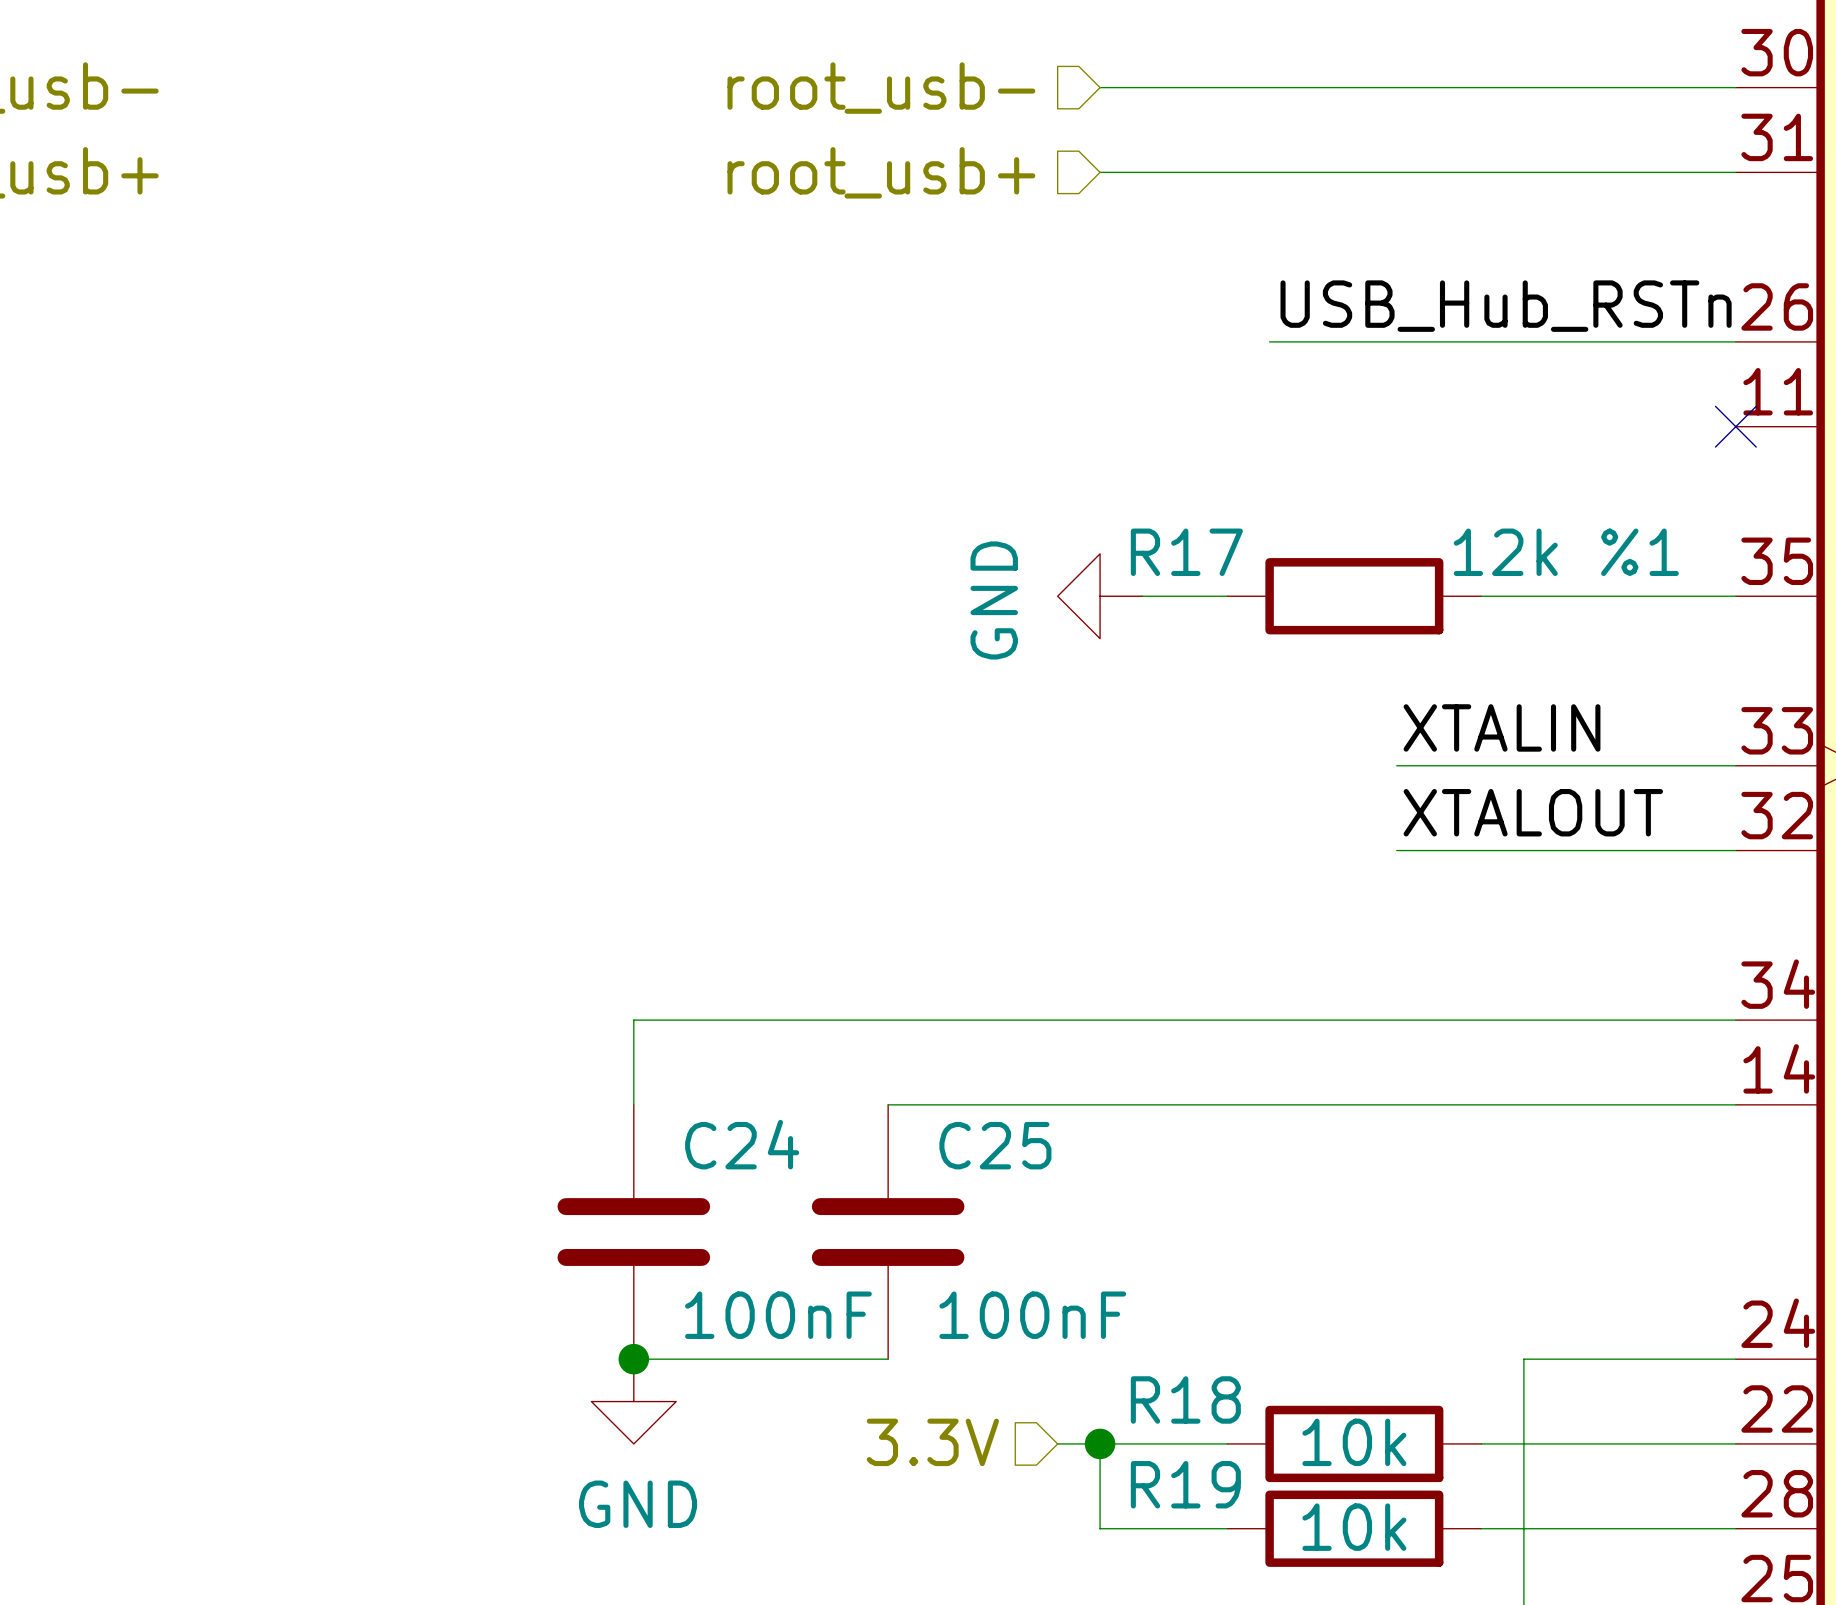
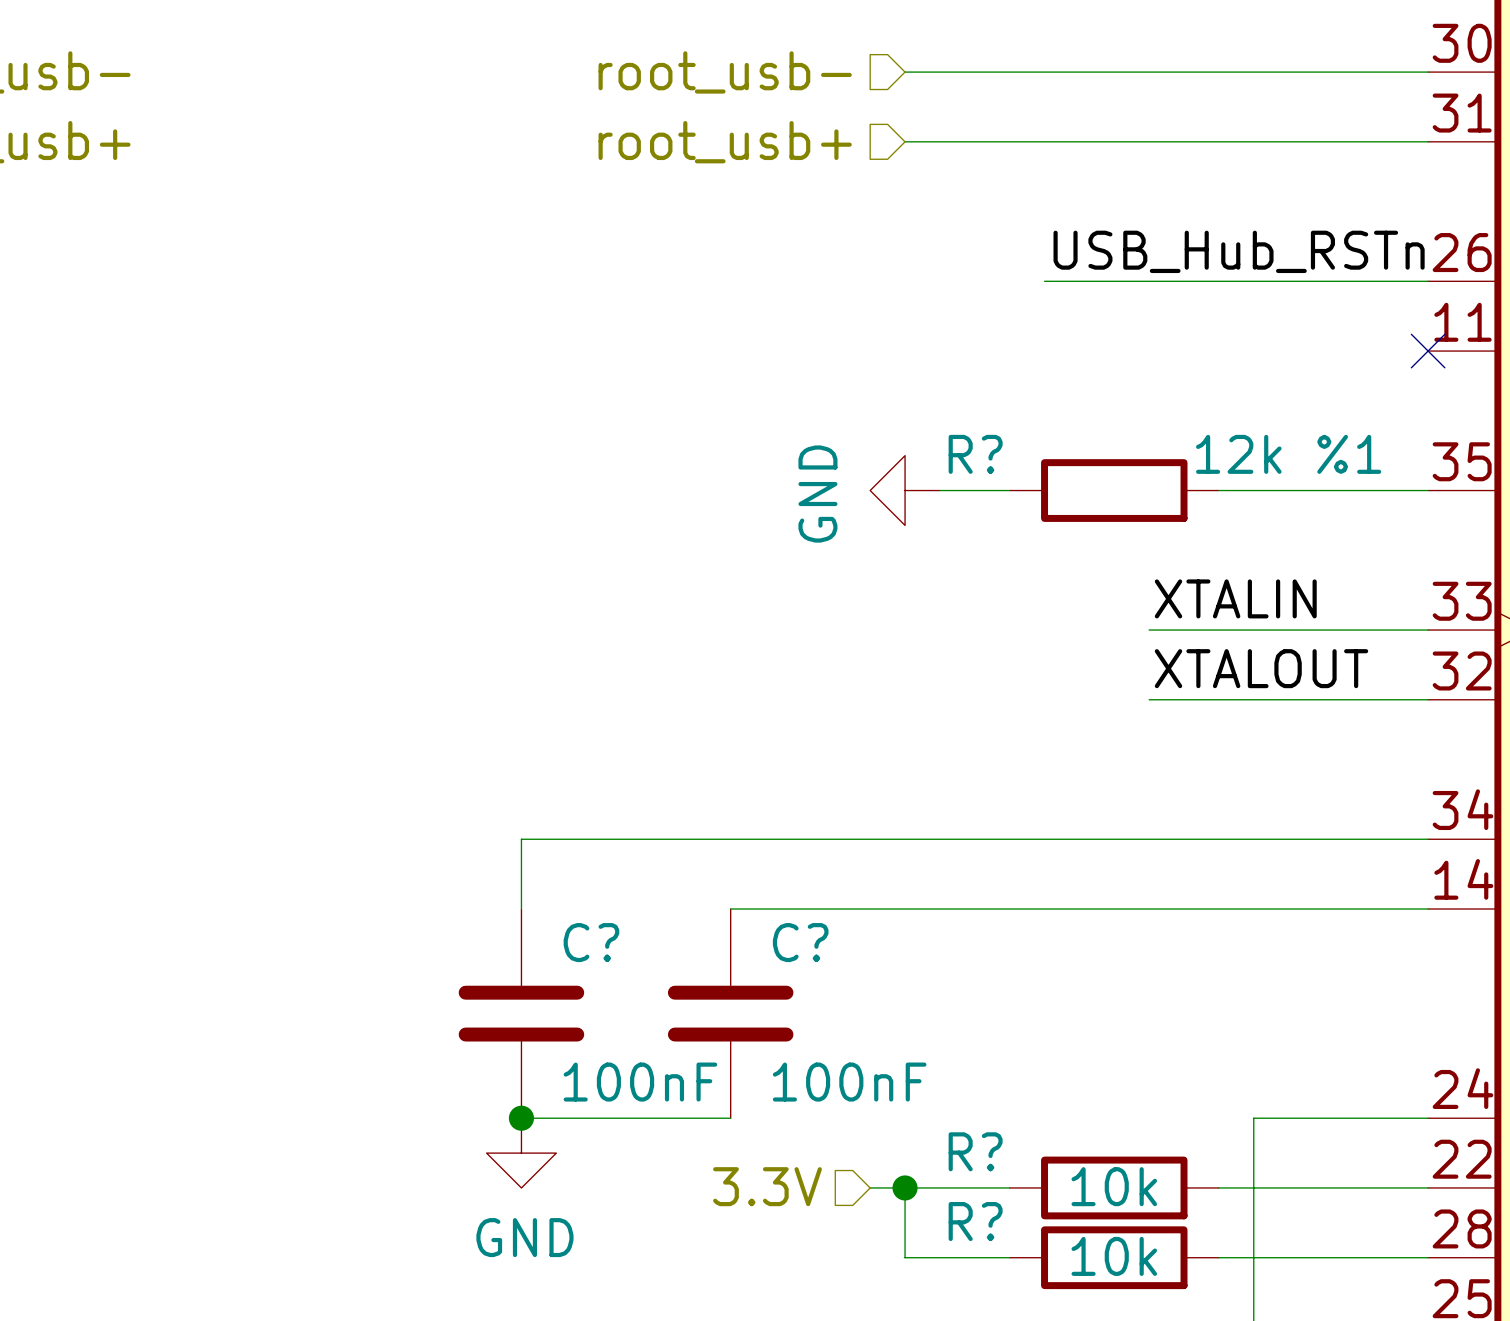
R17 name: R17 (1186, 552) -> R? (975, 454)
C24 name: C24 (742, 1144) -> C? (591, 942)
C25 name: C25 (995, 1145) -> C? (800, 942)
R18 name: R18 (1185, 1399) -> R? (975, 1151)
R19 name: R19 (1185, 1484) -> R? (975, 1221)

